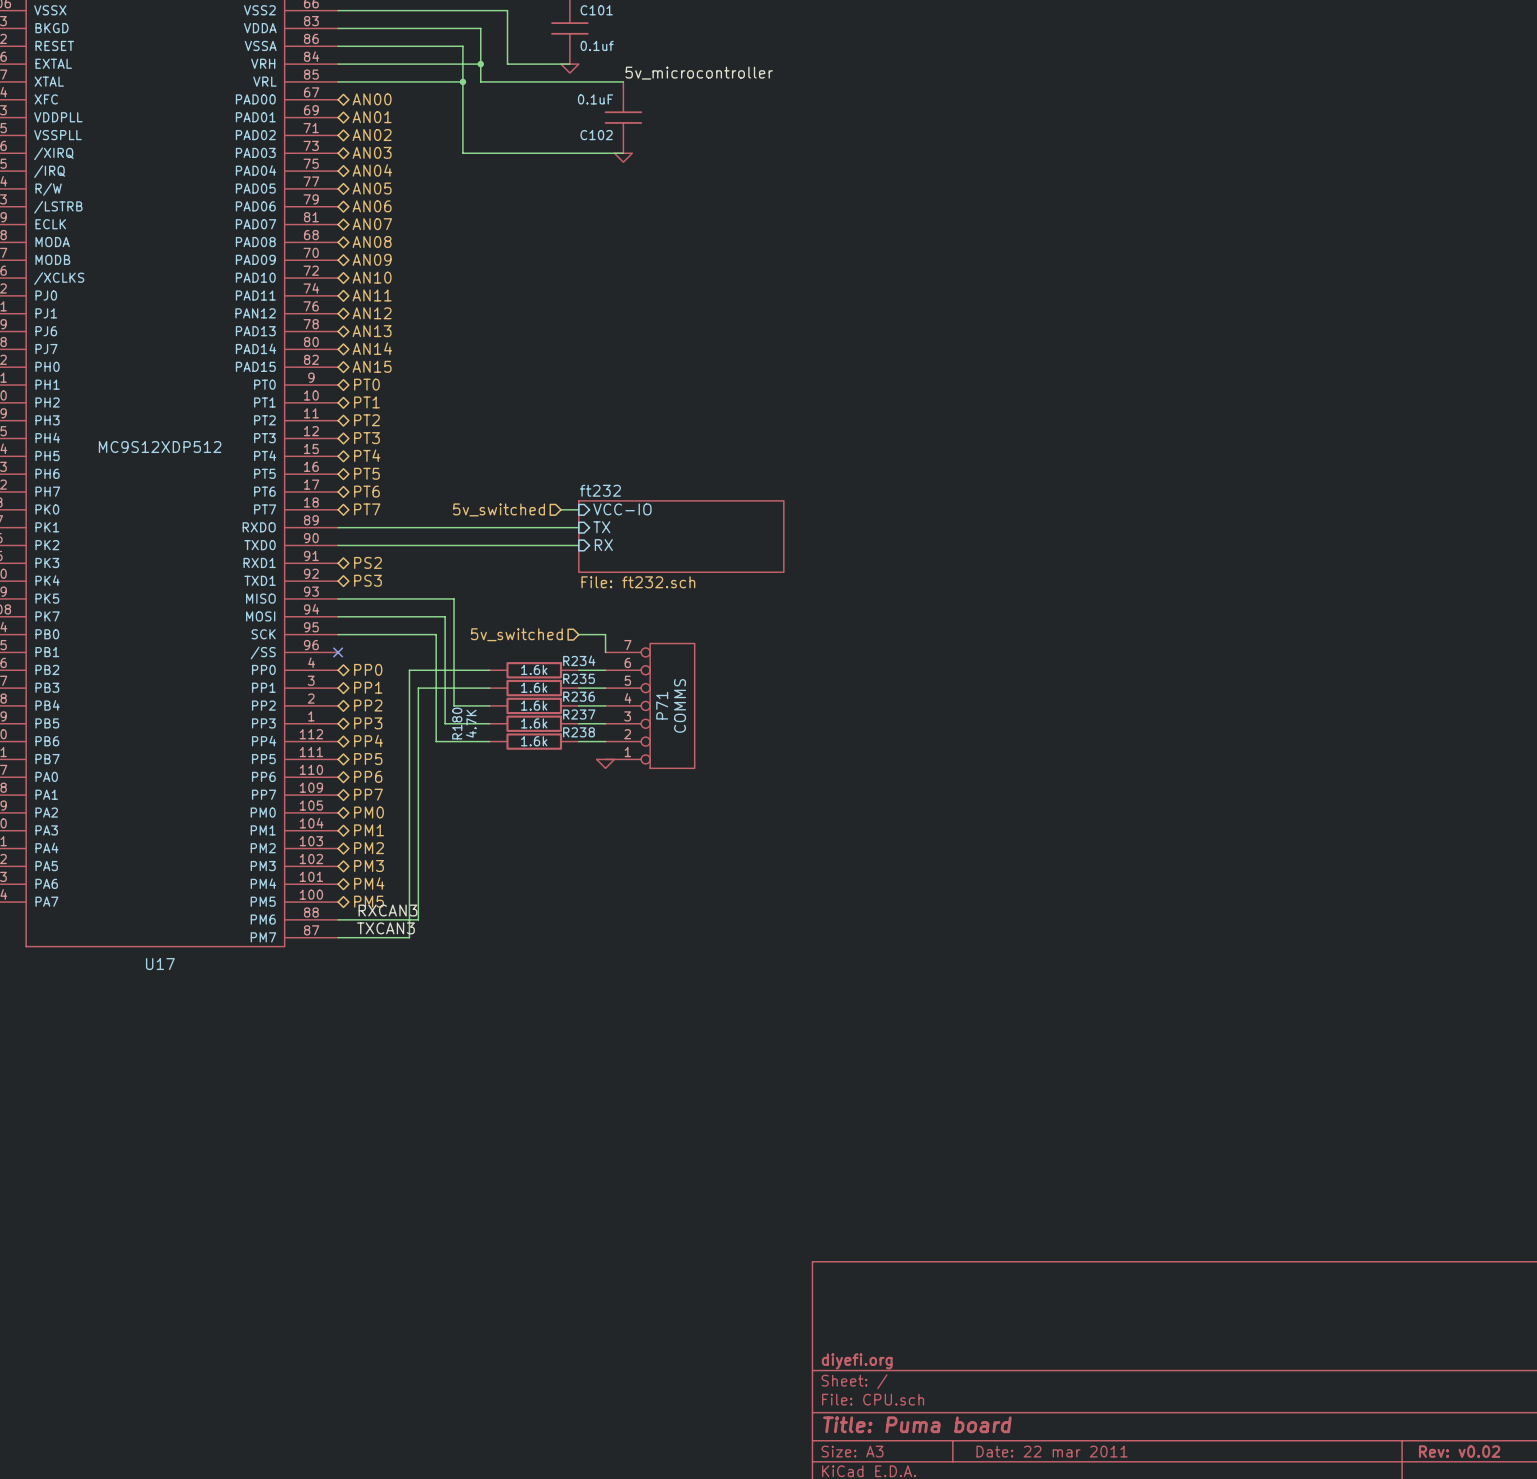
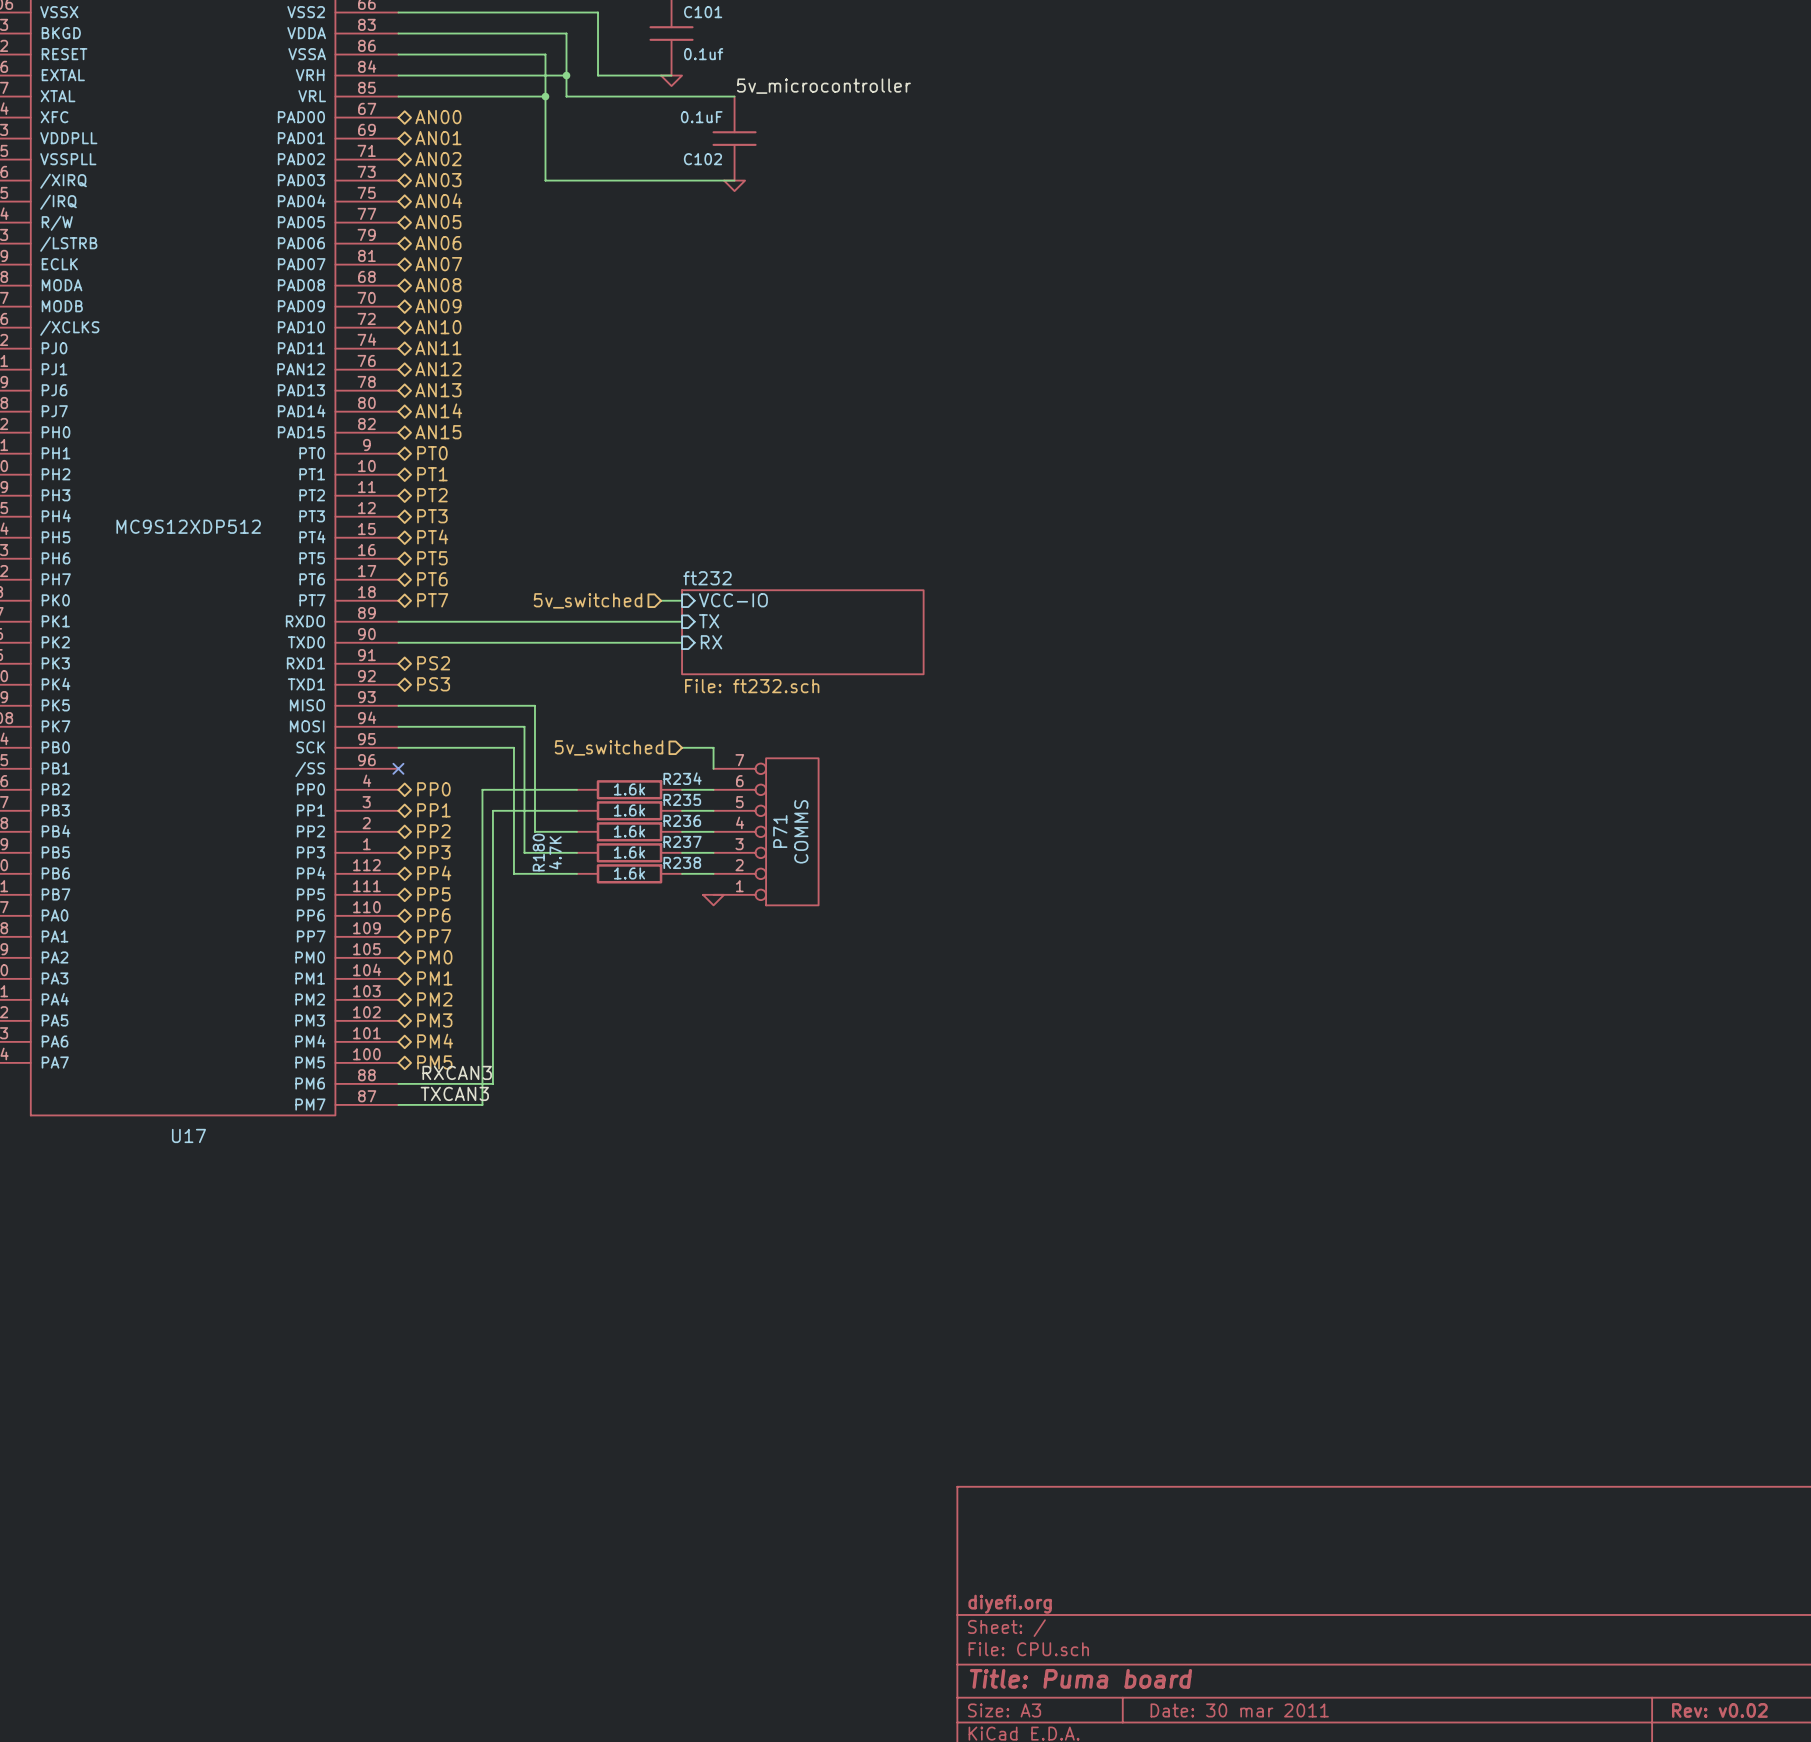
title block: Date: 22 mar 2011 (1052, 1451) -> Date: 30 mar 2011 (1239, 1710)

